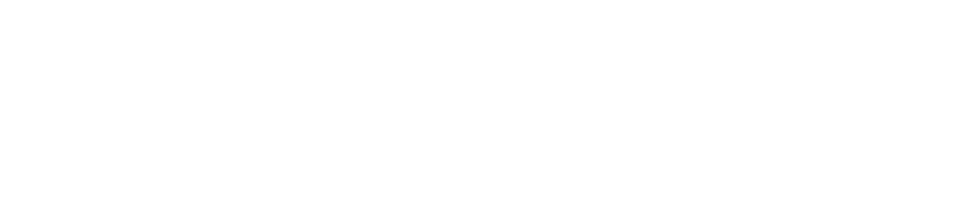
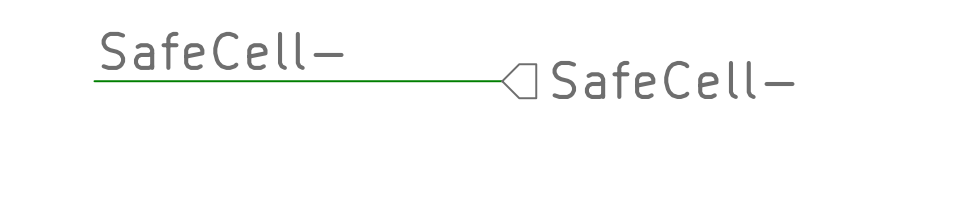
label: none -> SafeCell- (222, 50)
hierarchical label: none -> SafeCell- (673, 79)
wire: none -> (94, 81) (502, 81)

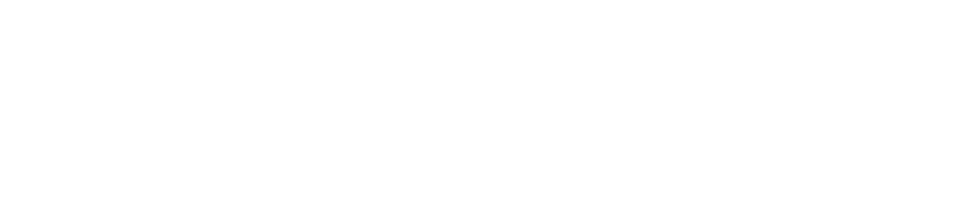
label: SafeCell- (222, 50) -> none
hierarchical label: SafeCell- (673, 79) -> none
wire: (94, 81) (502, 81) -> none

